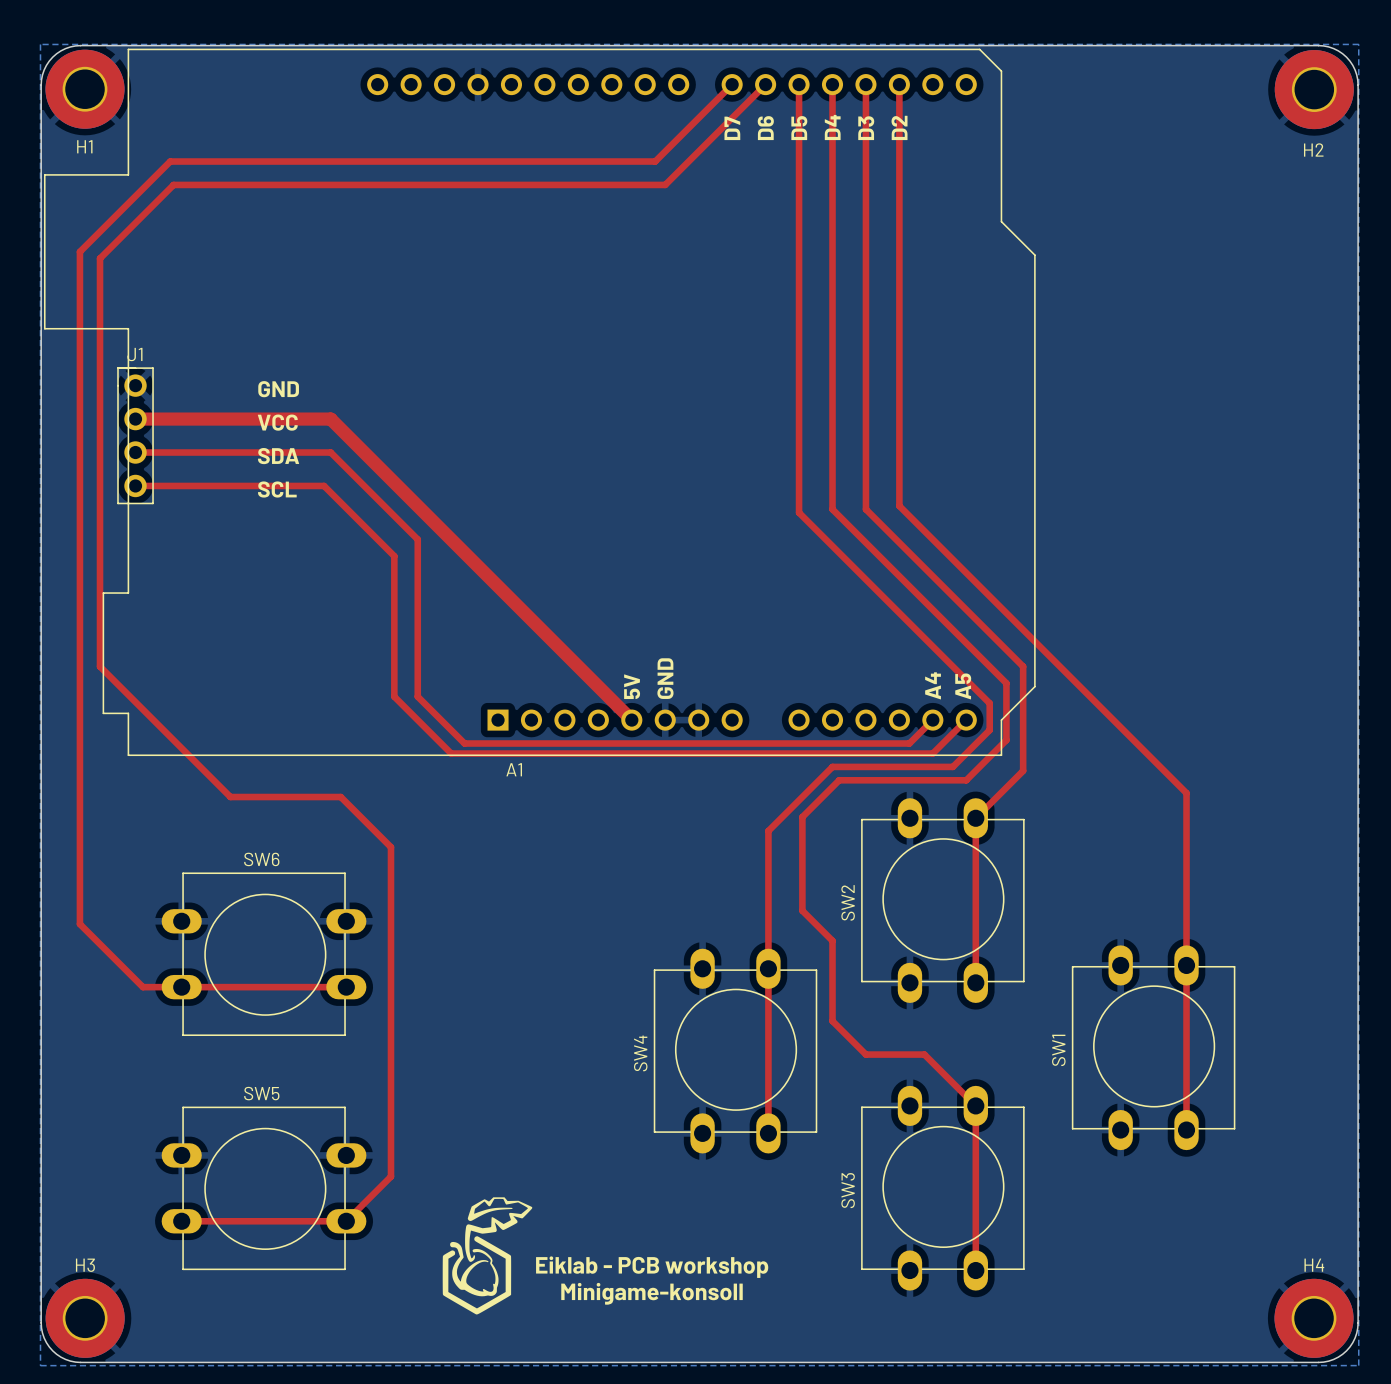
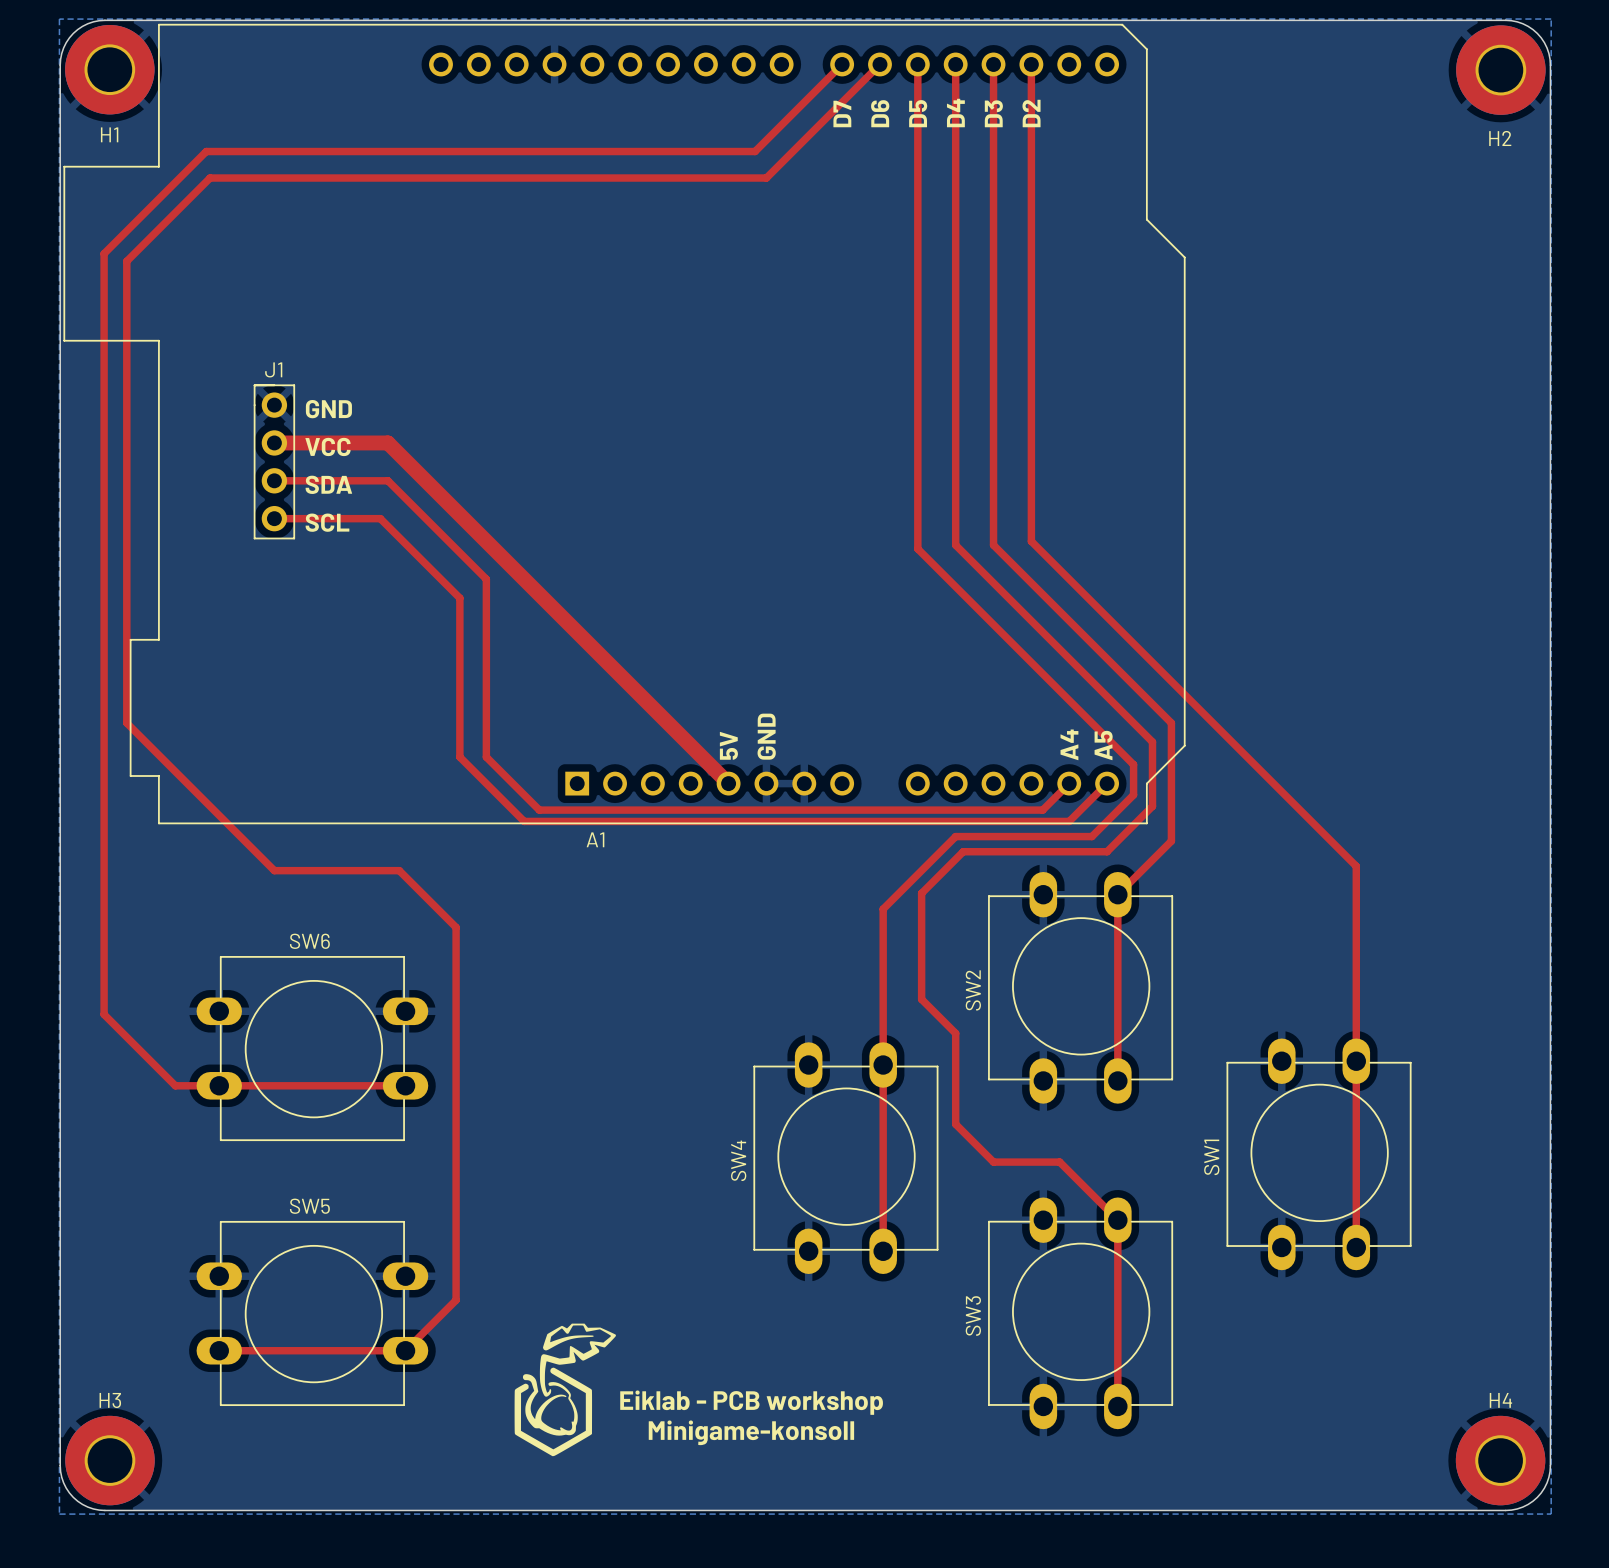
top track: (135, 419) (230, 419) -> none
J1 position: (135, 435) -> (274, 461)
top track: (135, 452) (230, 452) -> none
top track: (135, 485) (230, 485) -> none

